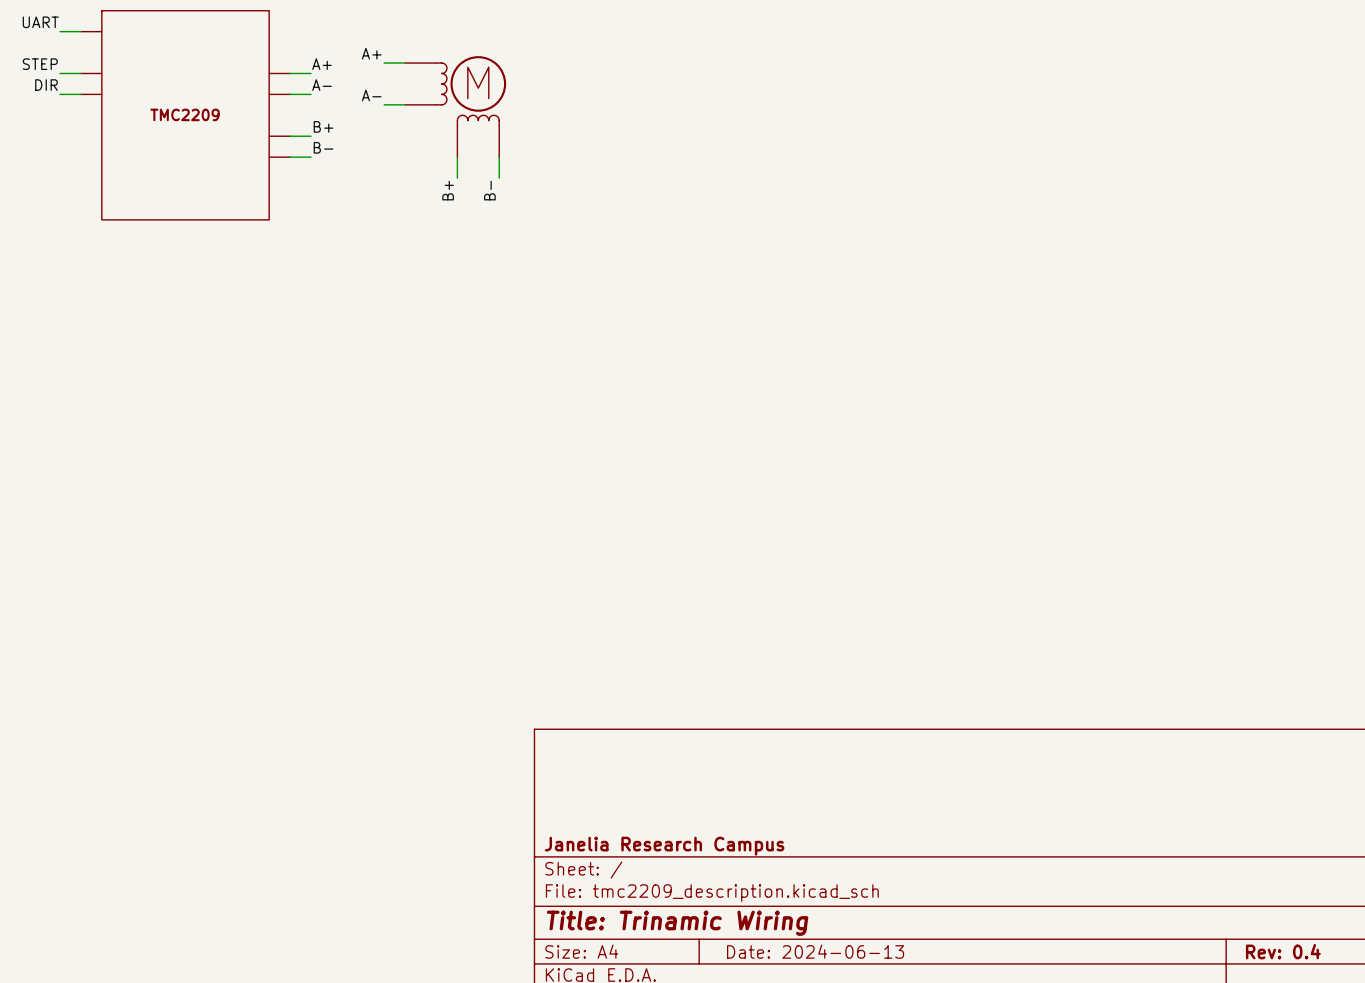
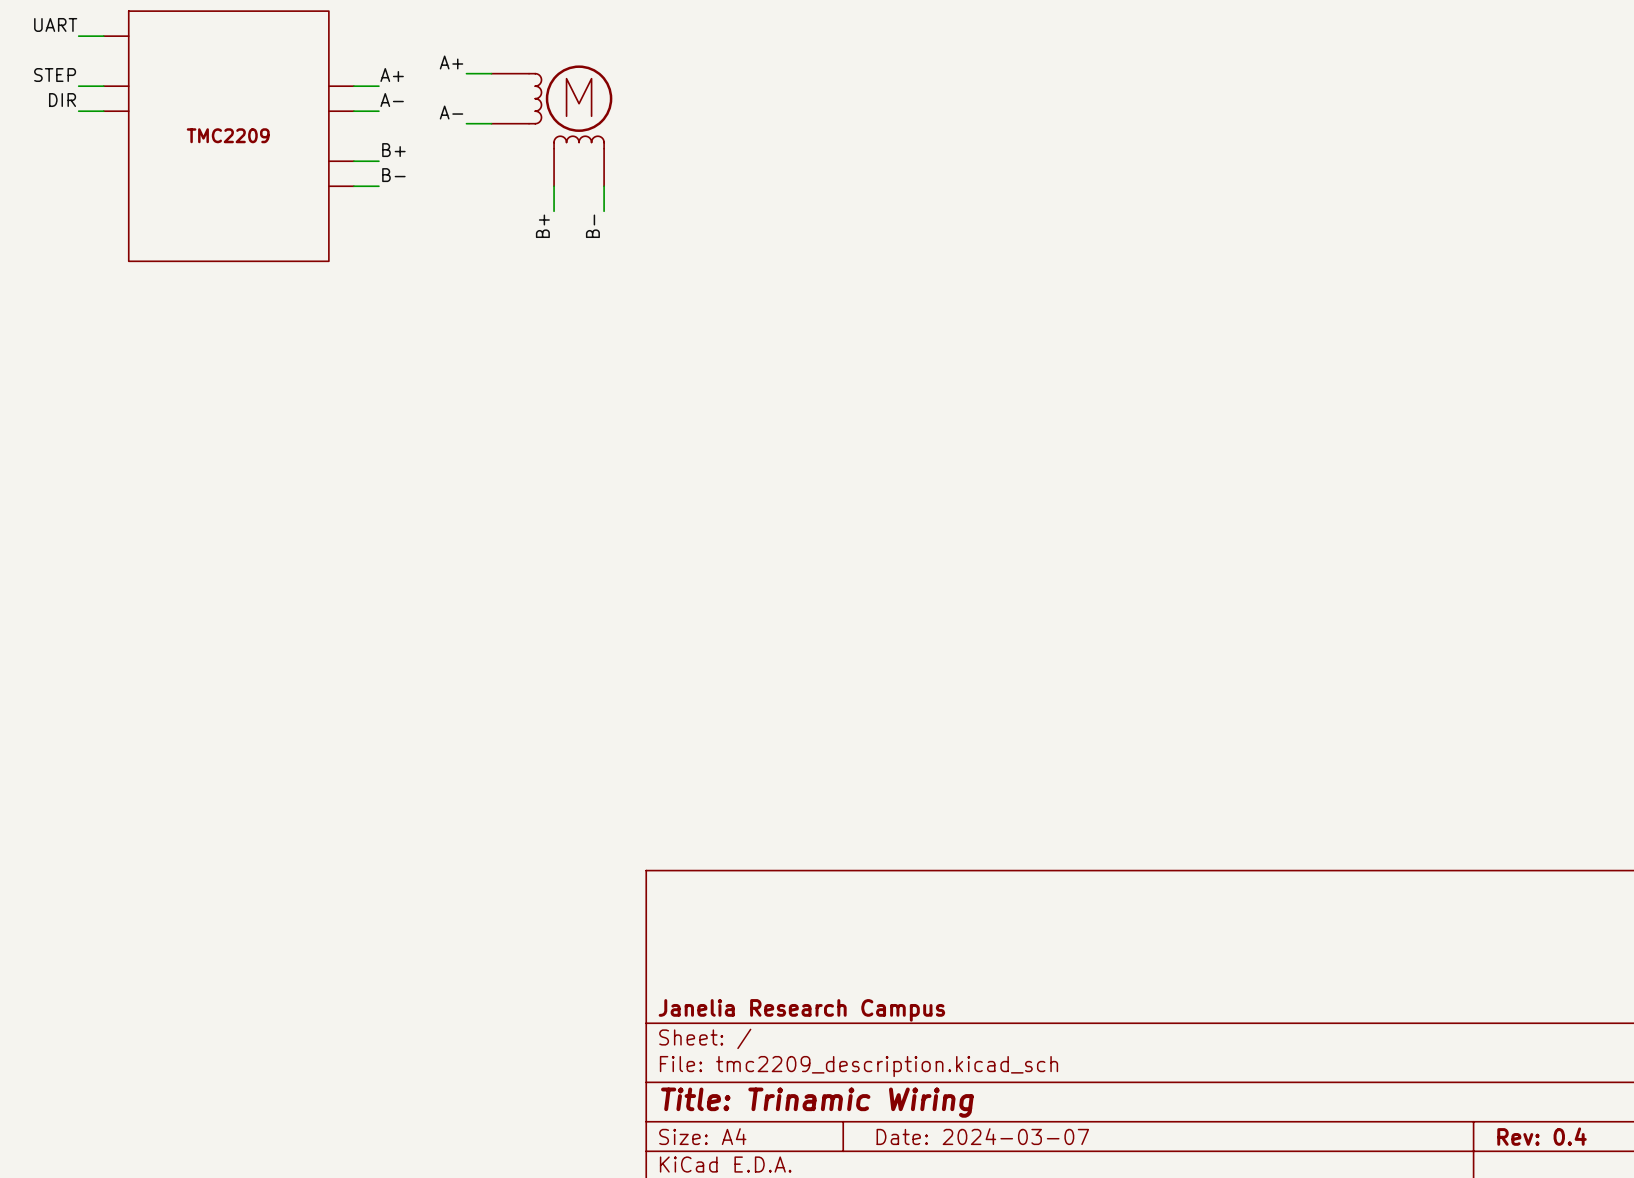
title block: Date: 2024-06-13 (815, 951) -> Date: 2024-03-07 (982, 1136)

